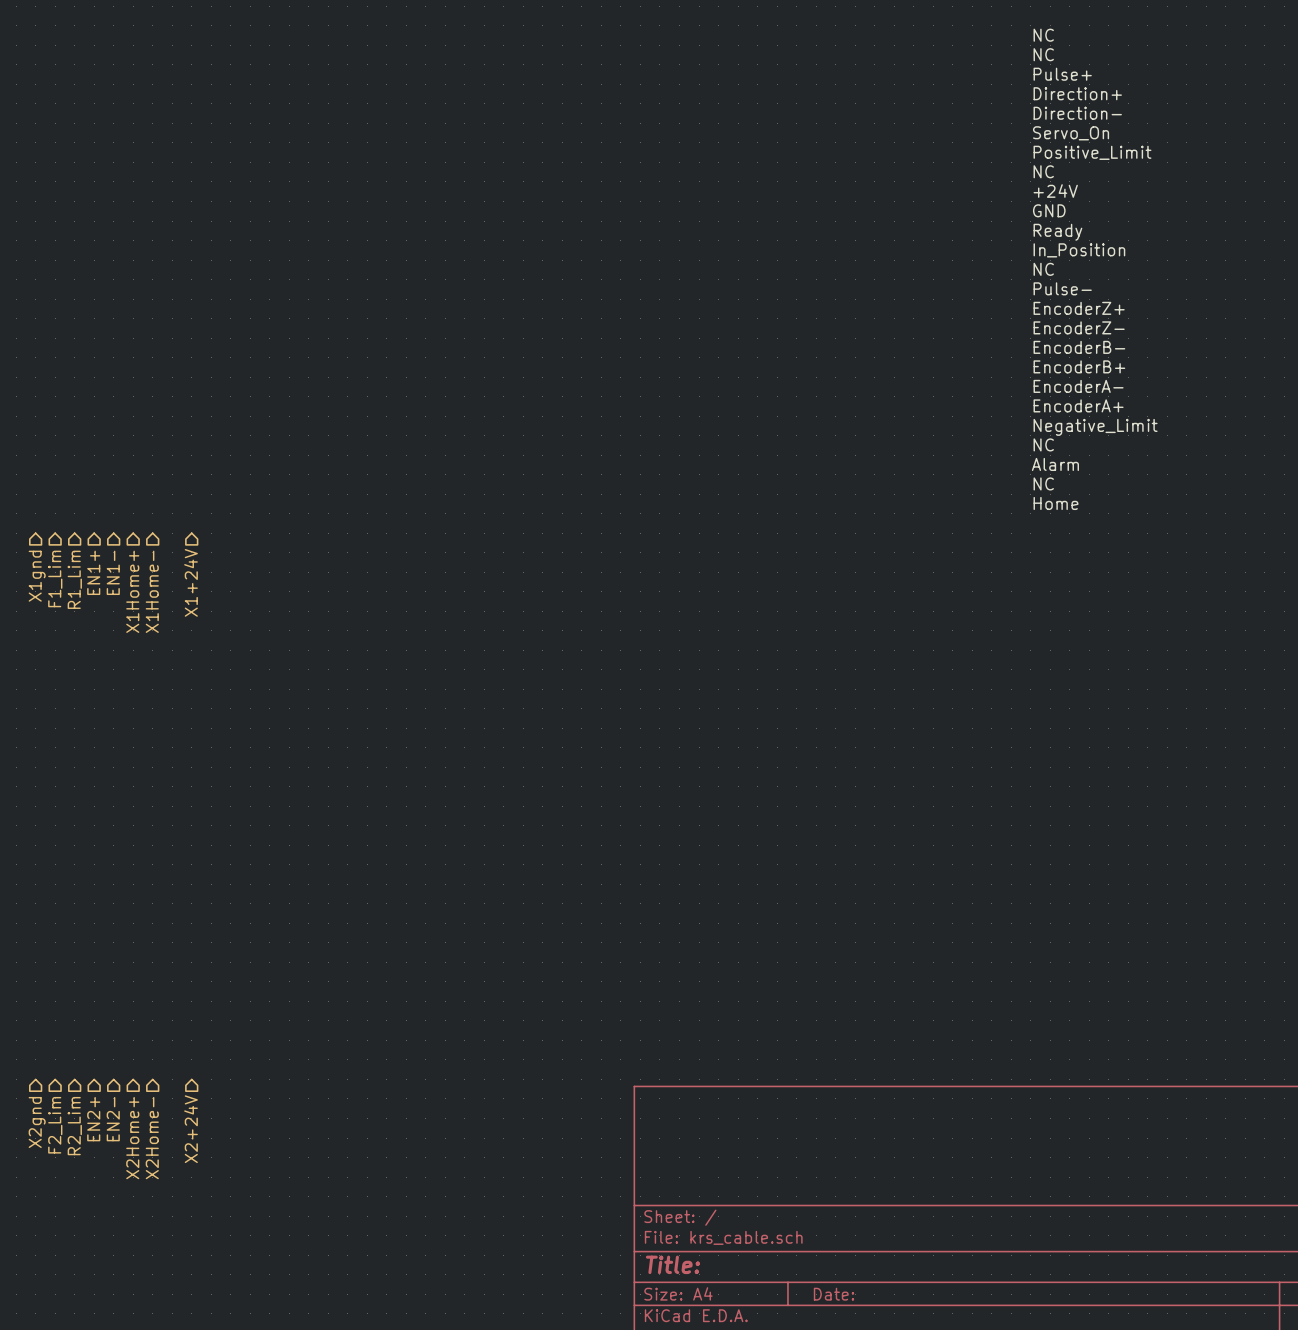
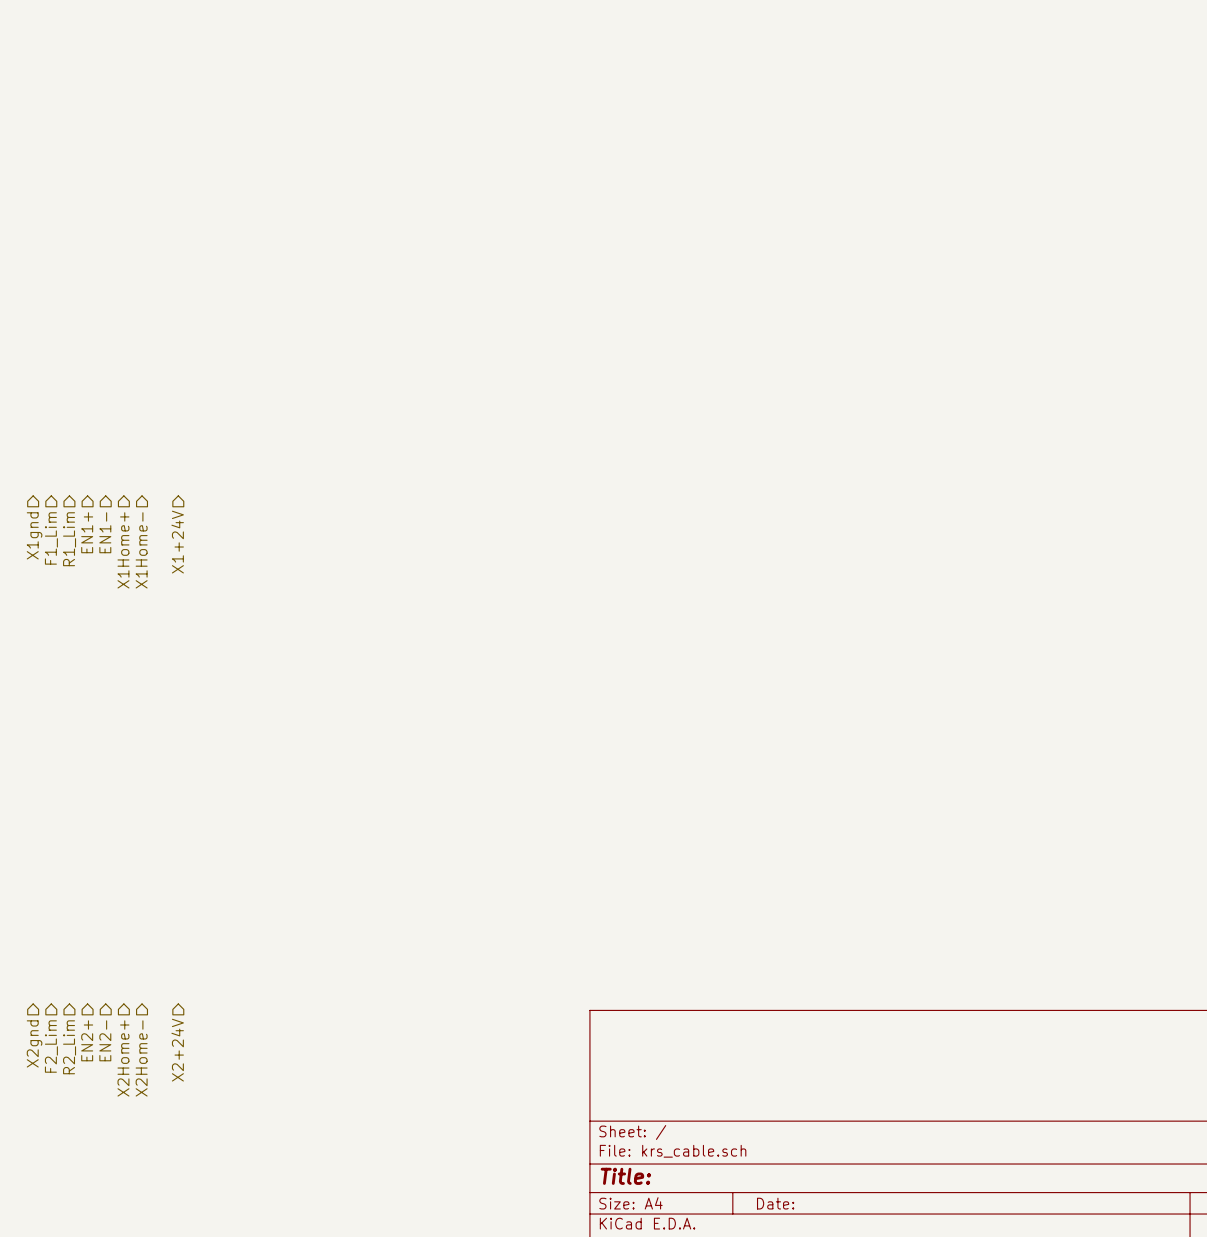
label: NC (1043, 35) -> none
label: NC (1043, 54) -> none
label: Pulse+ (1062, 74) -> none
label: Direction+ (1077, 93) -> none
label: Direction- (1077, 113) -> none
label: Servo_On (1071, 133) -> none
label: Positive_Limit (1092, 152) -> none
label: NC (1043, 171) -> none
label: +24V (1055, 191) -> none
label: GND (1049, 210) -> none
label: Ready (1057, 232) -> none
label: In_Position (1079, 250) -> none
label: NC (1043, 269) -> none
label: Pulse- (1062, 288) -> none
label: EncoderZ+ (1079, 308) -> none
label: EncoderZ- (1079, 327) -> none
label: EncoderB- (1079, 347) -> none
label: EncoderB+ (1079, 366) -> none
label: EncoderA- (1078, 386) -> none
label: EncoderA+ (1078, 405) -> none
label: Negative_Limit (1095, 427) -> none
label: NC (1043, 444) -> none
label: Alarm (1055, 464) -> none
label: NC (1043, 483) -> none
label: Home (1055, 503) -> none

